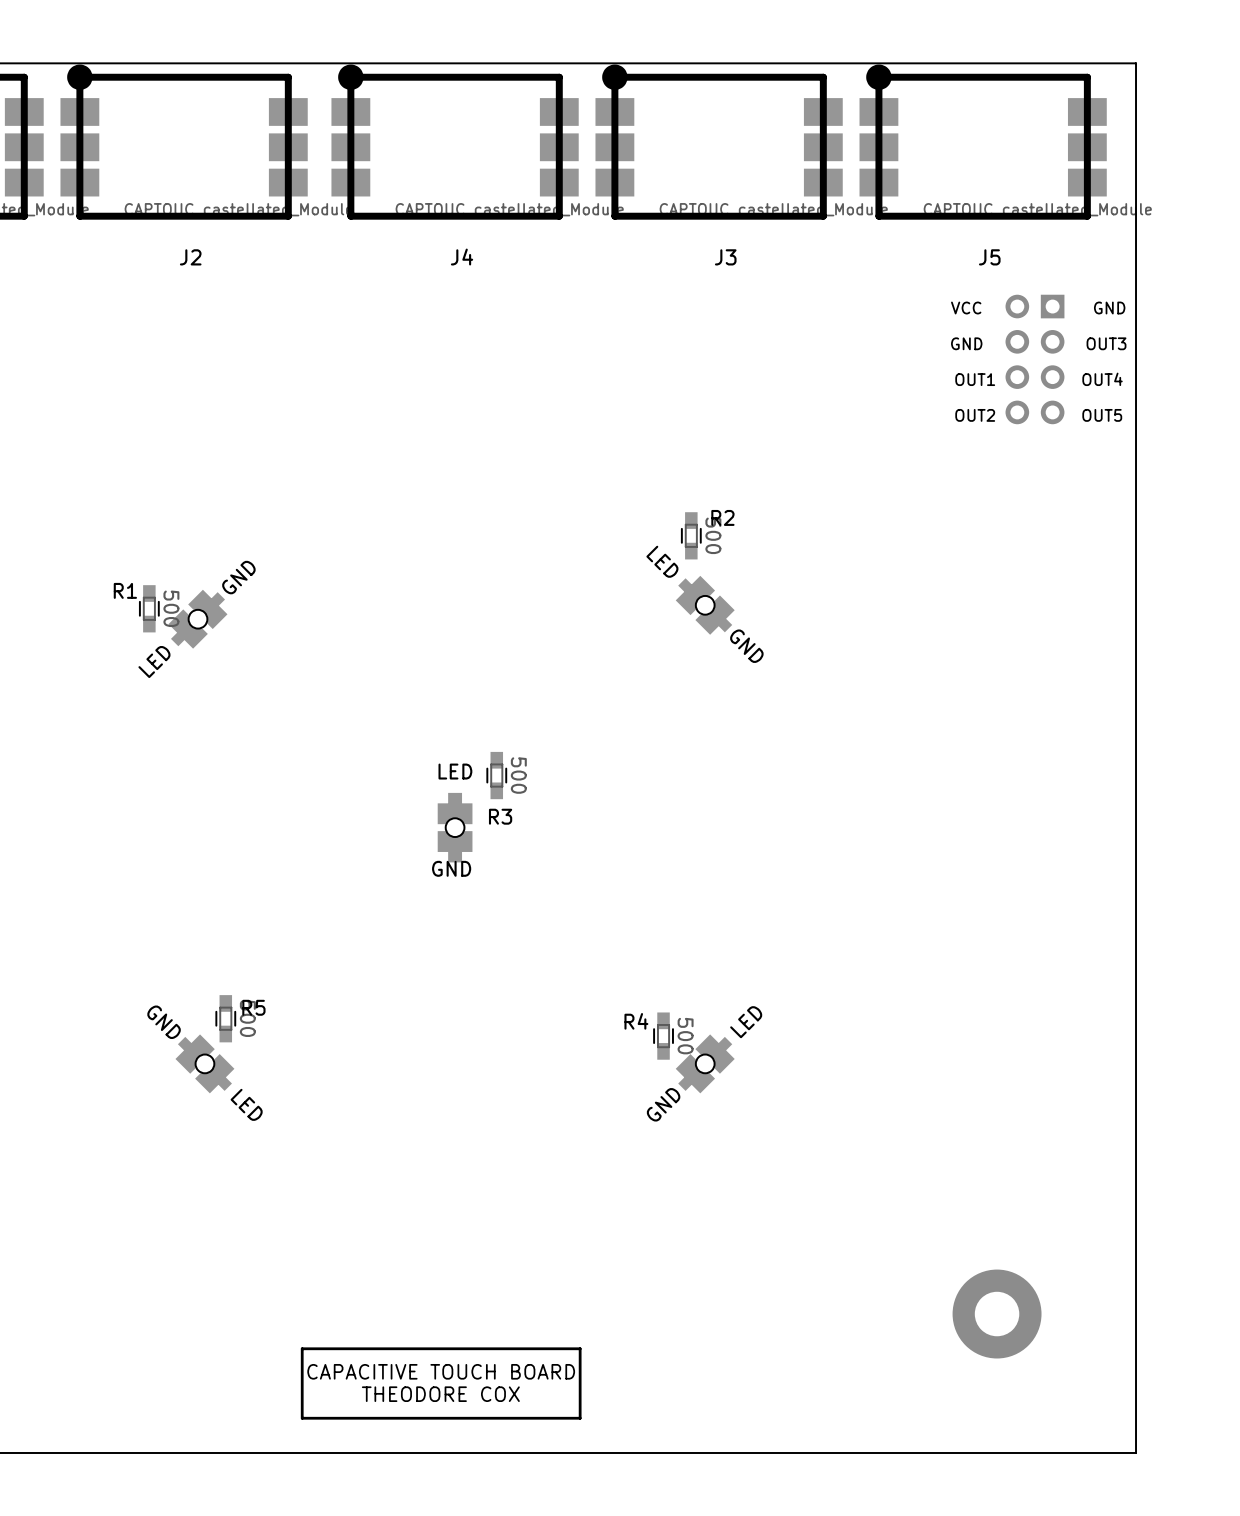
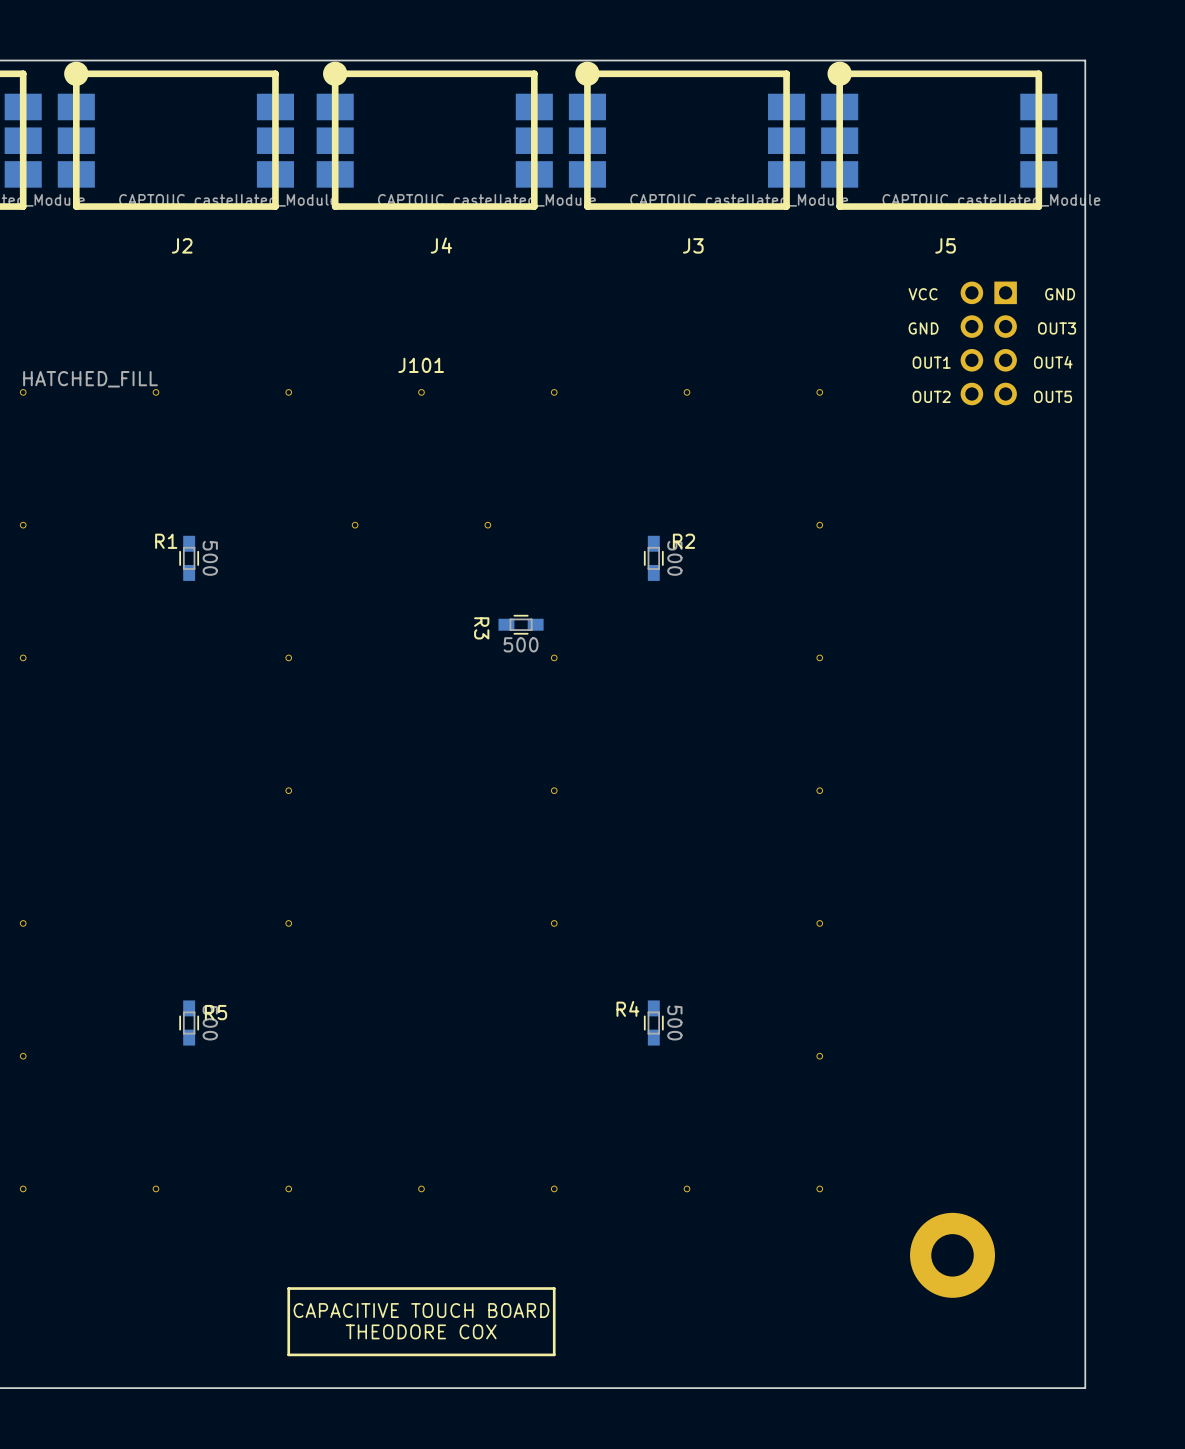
R2 position: (691, 535) -> (653, 558)
part: (705, 605) -> none
R1 position: (149, 608) -> (189, 558)
part: (198, 619) -> none
R3 rotation: 0° (496, 775) -> 90° clockwise (521, 624)
R3 position: (496, 775) -> (521, 624)
J101: none -> HATCHED_FILL (421, 790)
part: (455, 827) -> none
R5 position: (225, 1018) -> (189, 1023)
R4 position: (663, 1036) -> (653, 1023)
part: (204, 1063) -> none
part: (705, 1063) -> none

